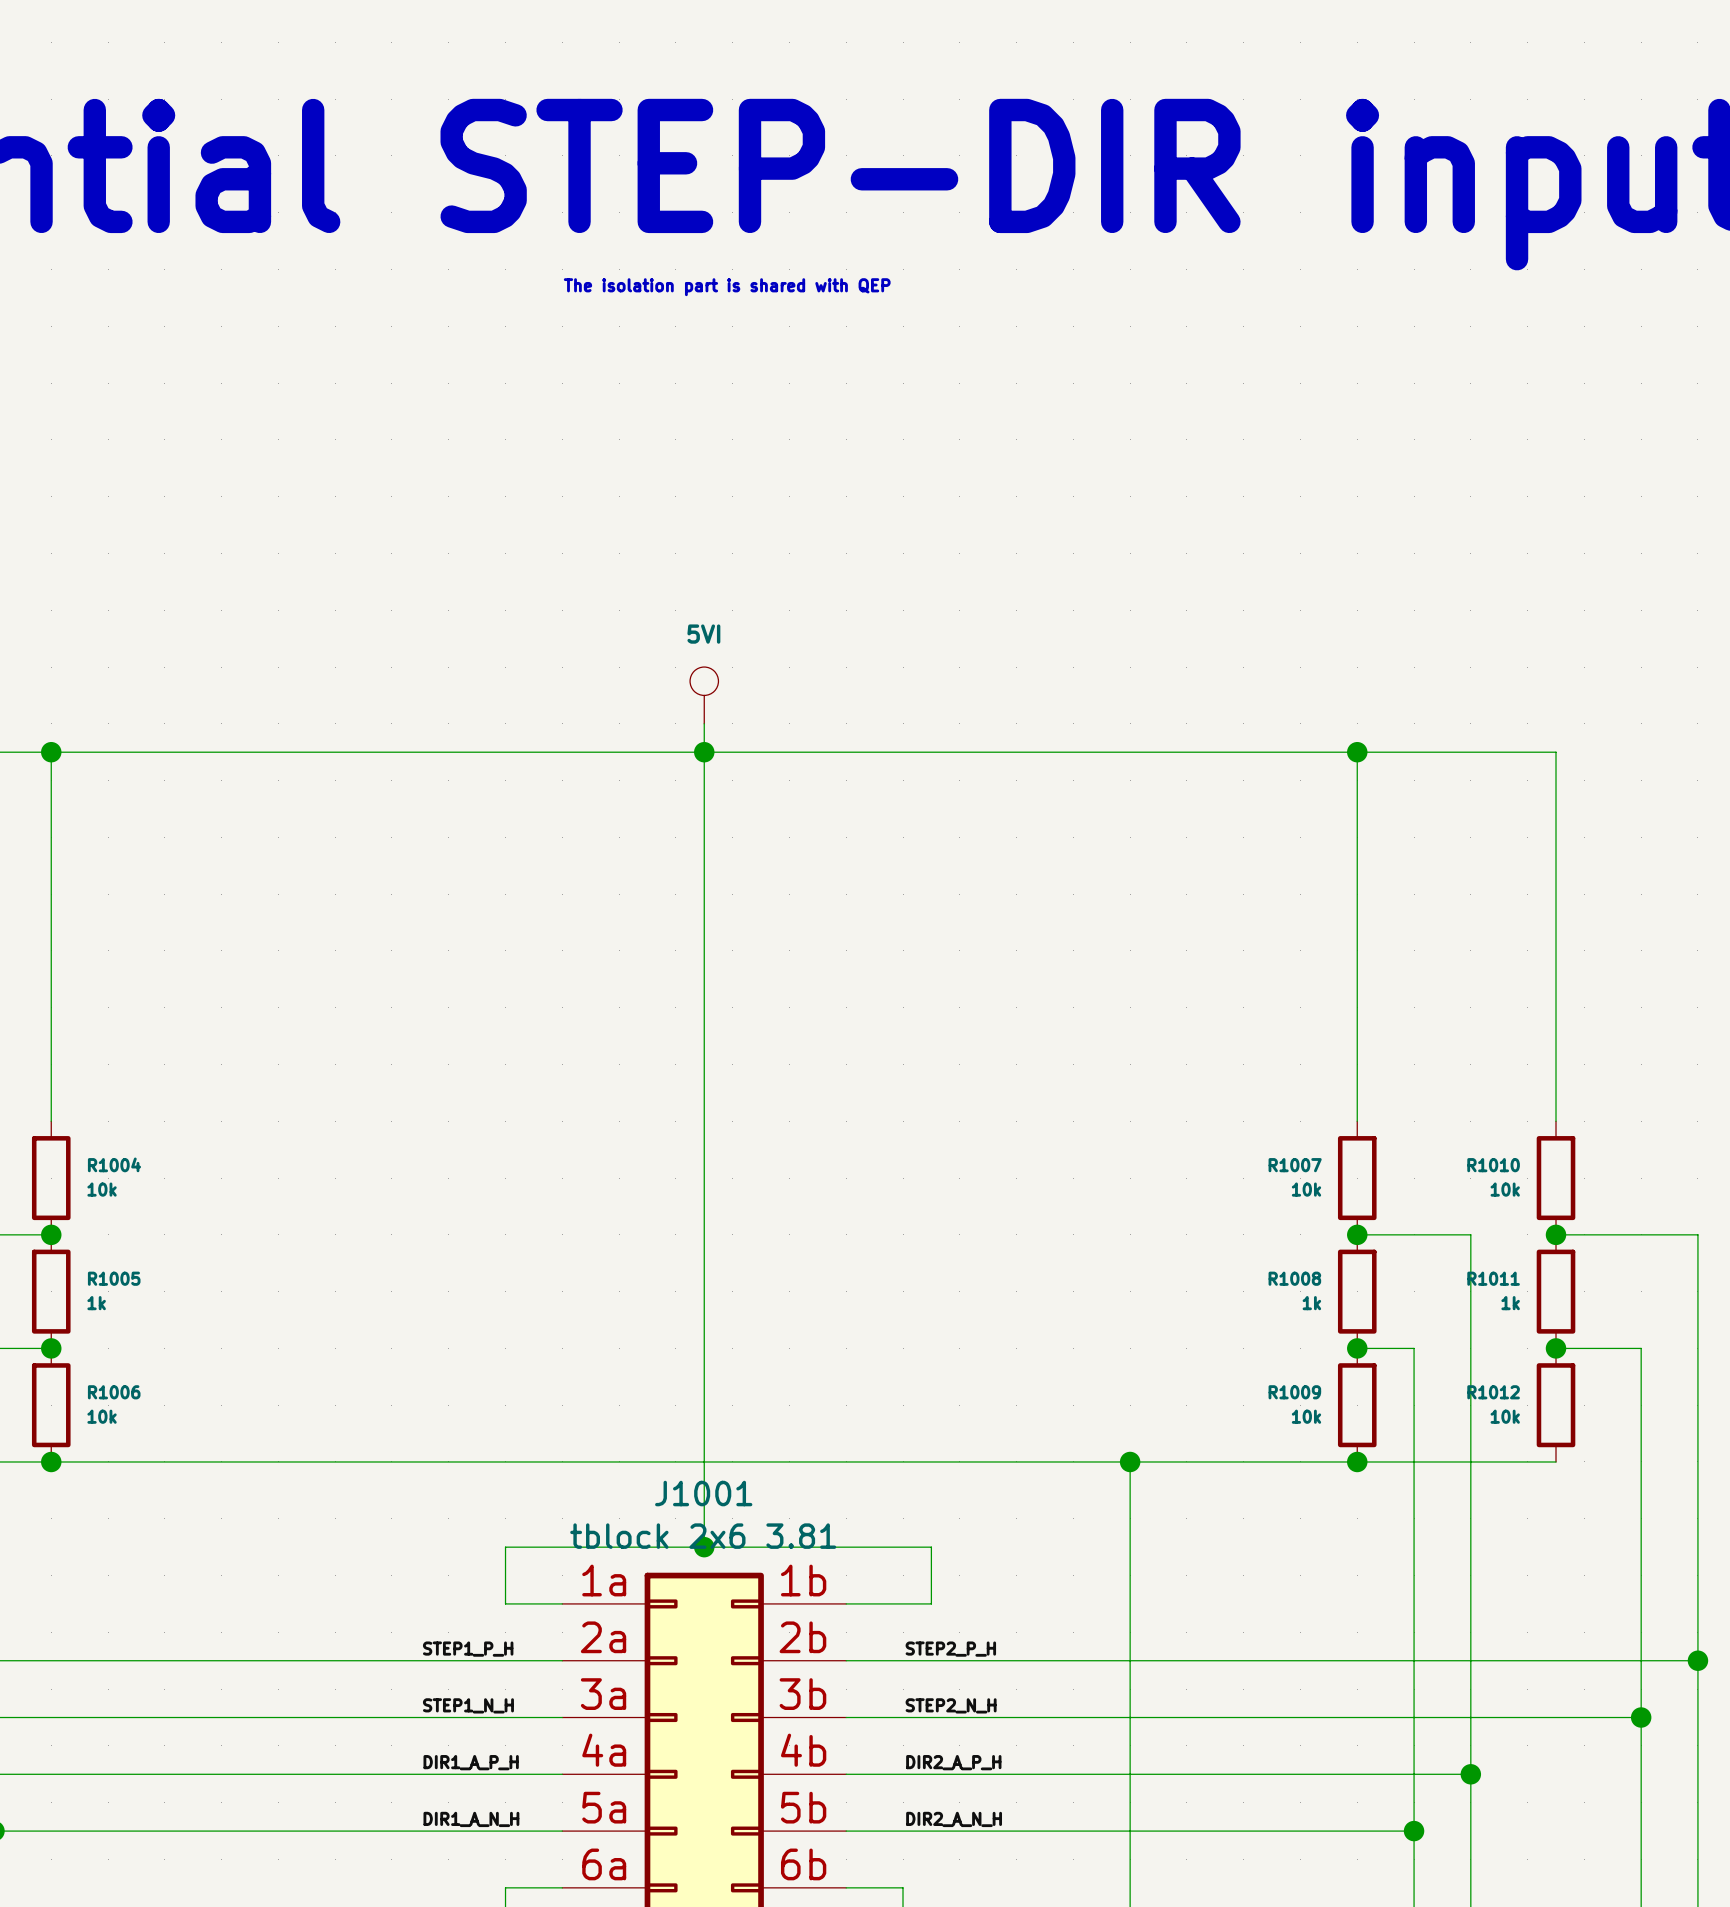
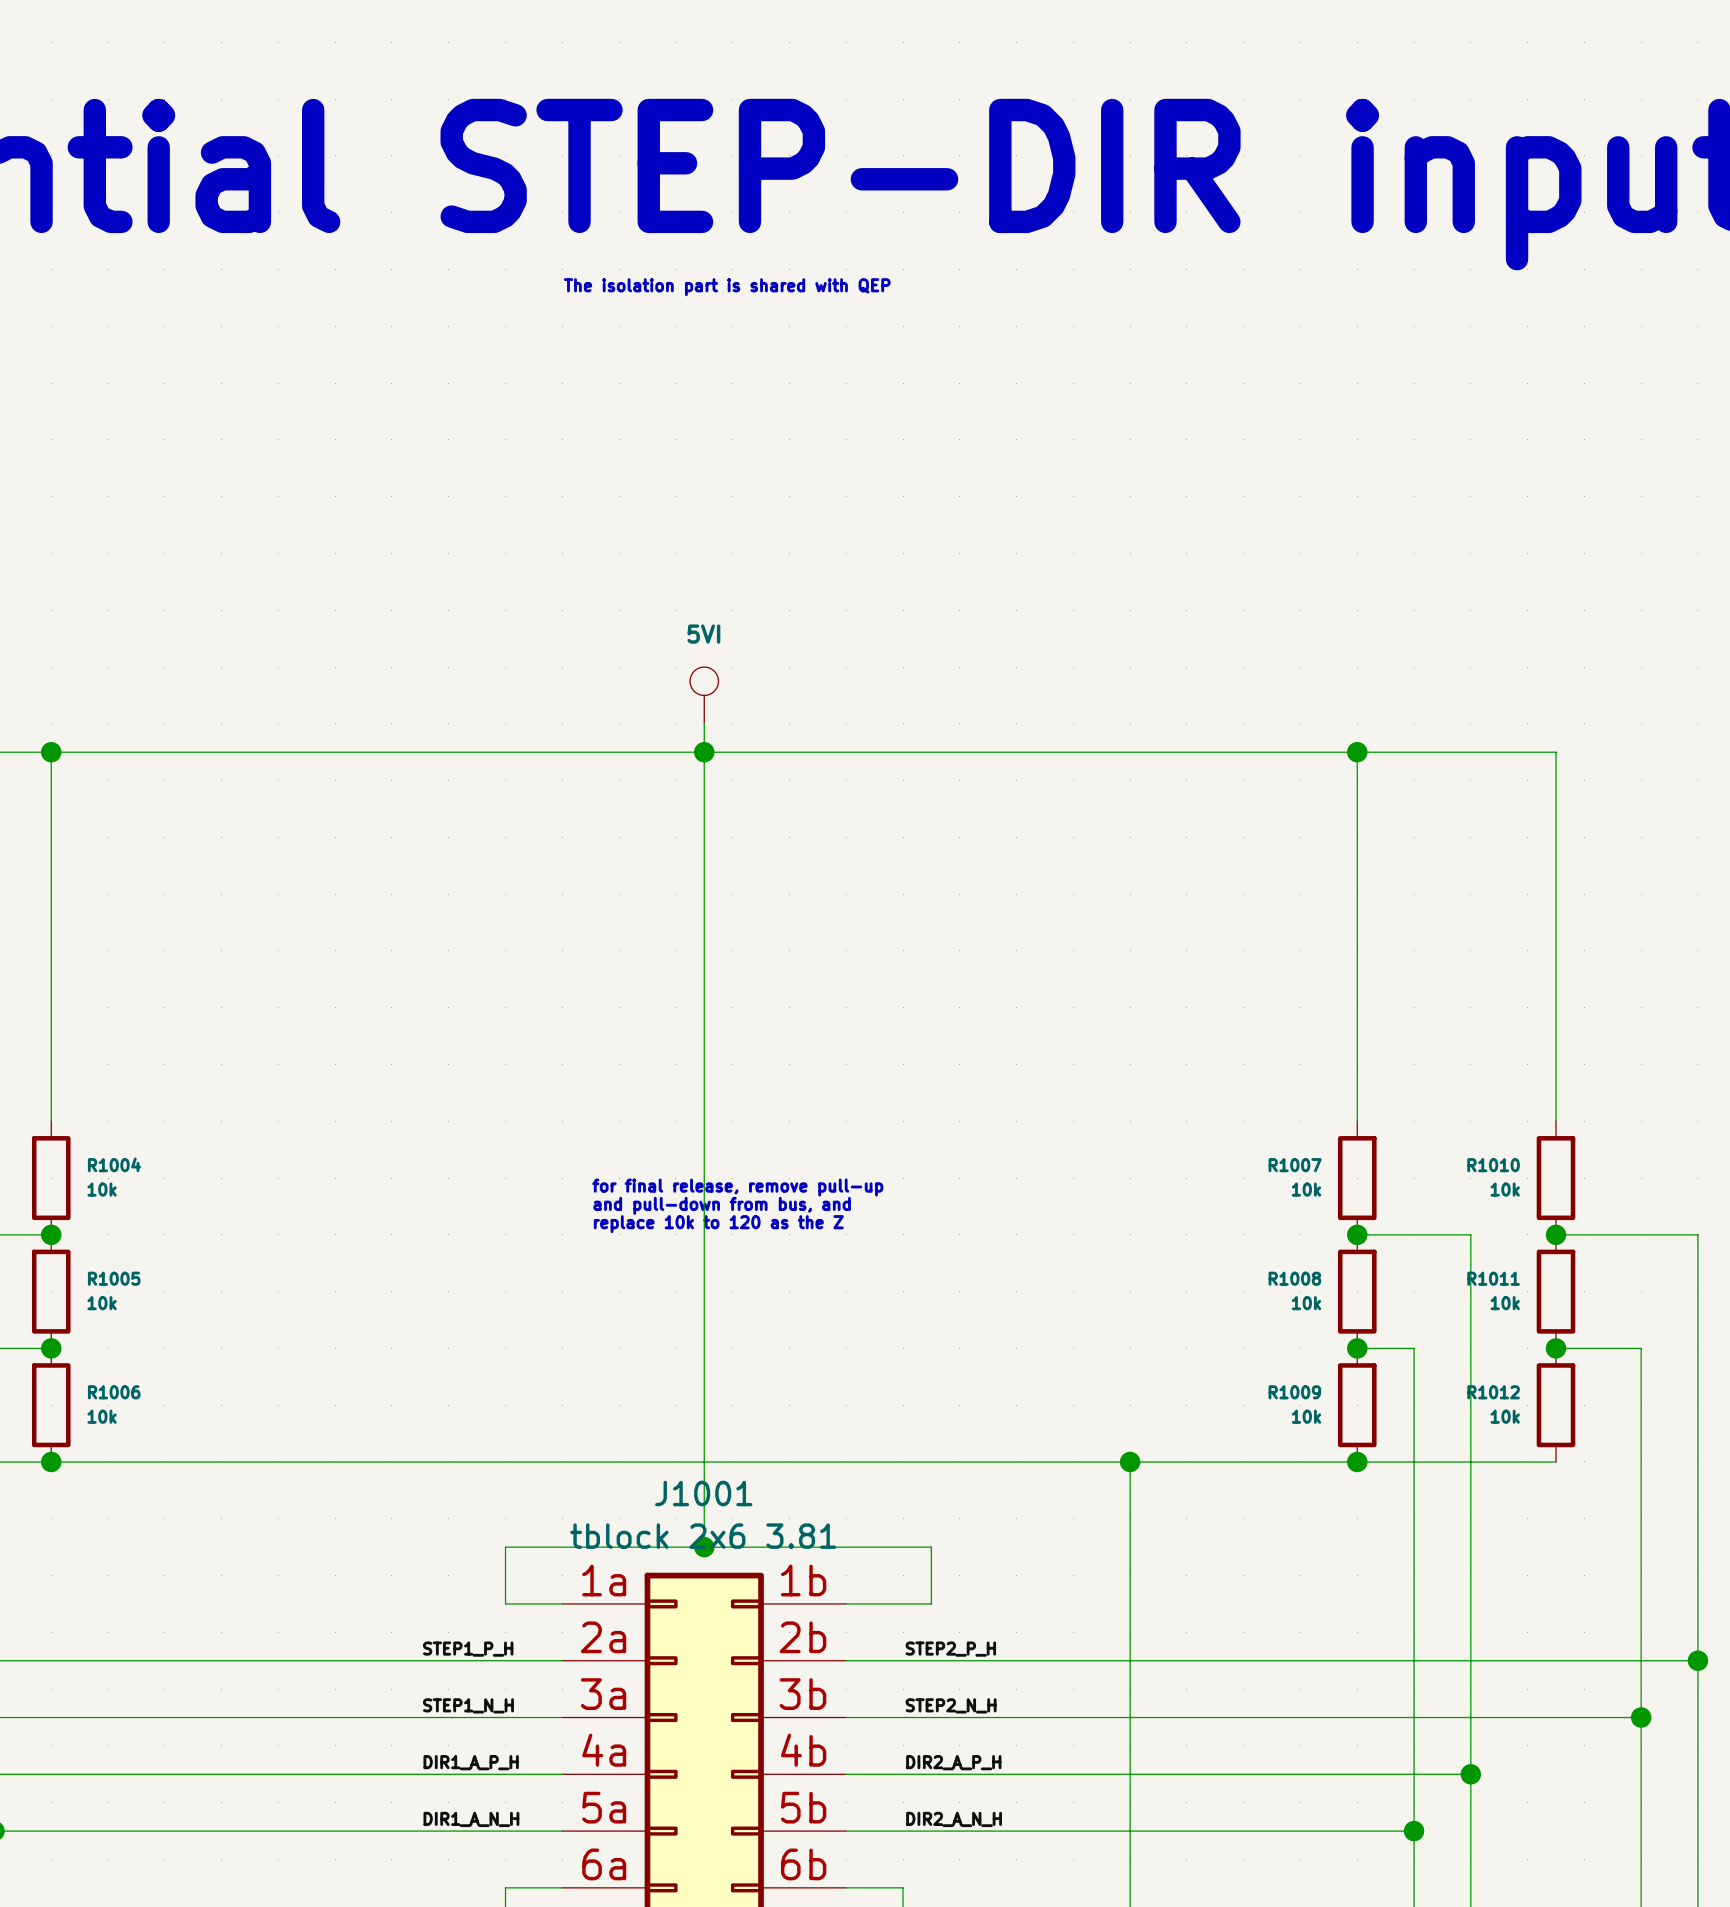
text: none -> for final release, remove pull-up (737, 1187)
text: none -> and pull-down from bus, and (722, 1205)
text: none -> replace 10k to 120 as the Z (718, 1224)
R1005 value: 1k (96, 1303) -> 10k (102, 1303)
R1008 value: 1k (1311, 1303) -> 10k (1306, 1303)
R1011 value: 1k (1510, 1303) -> 10k (1505, 1303)

